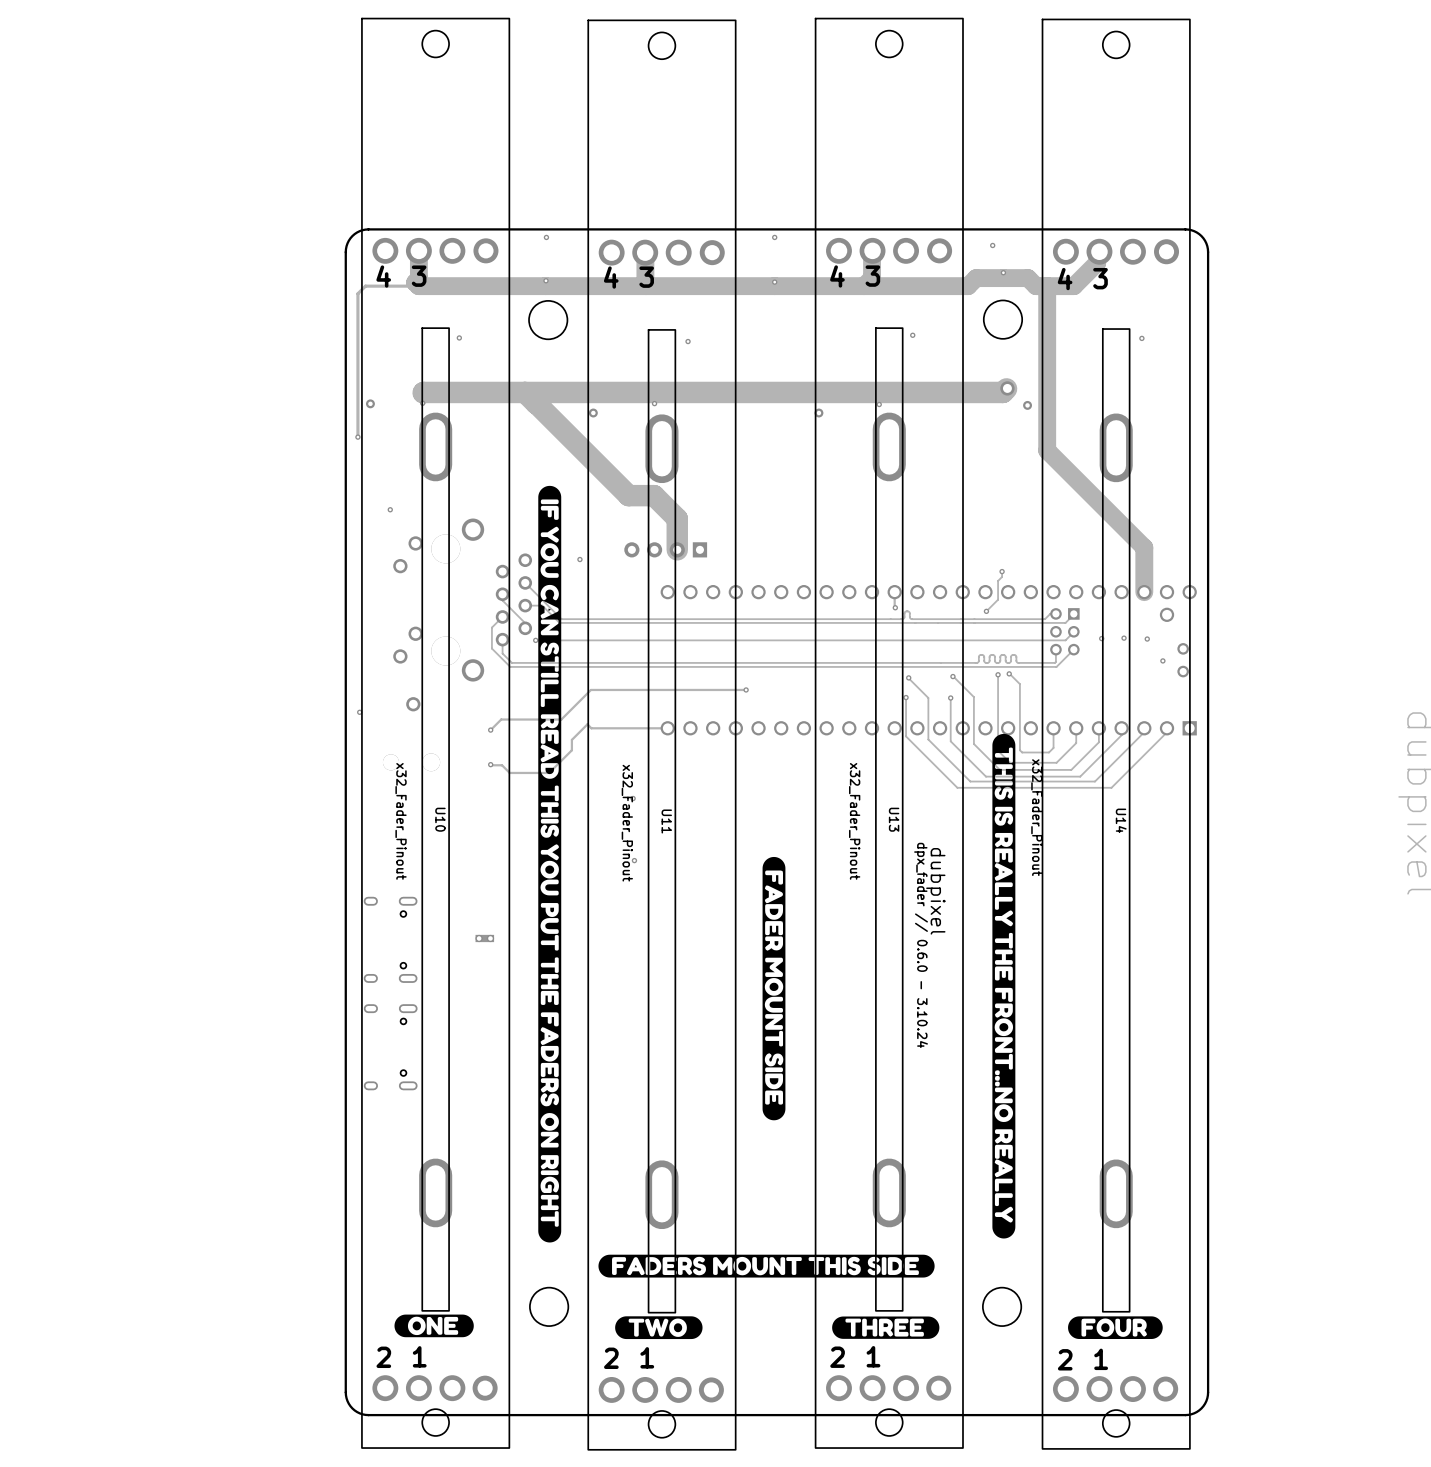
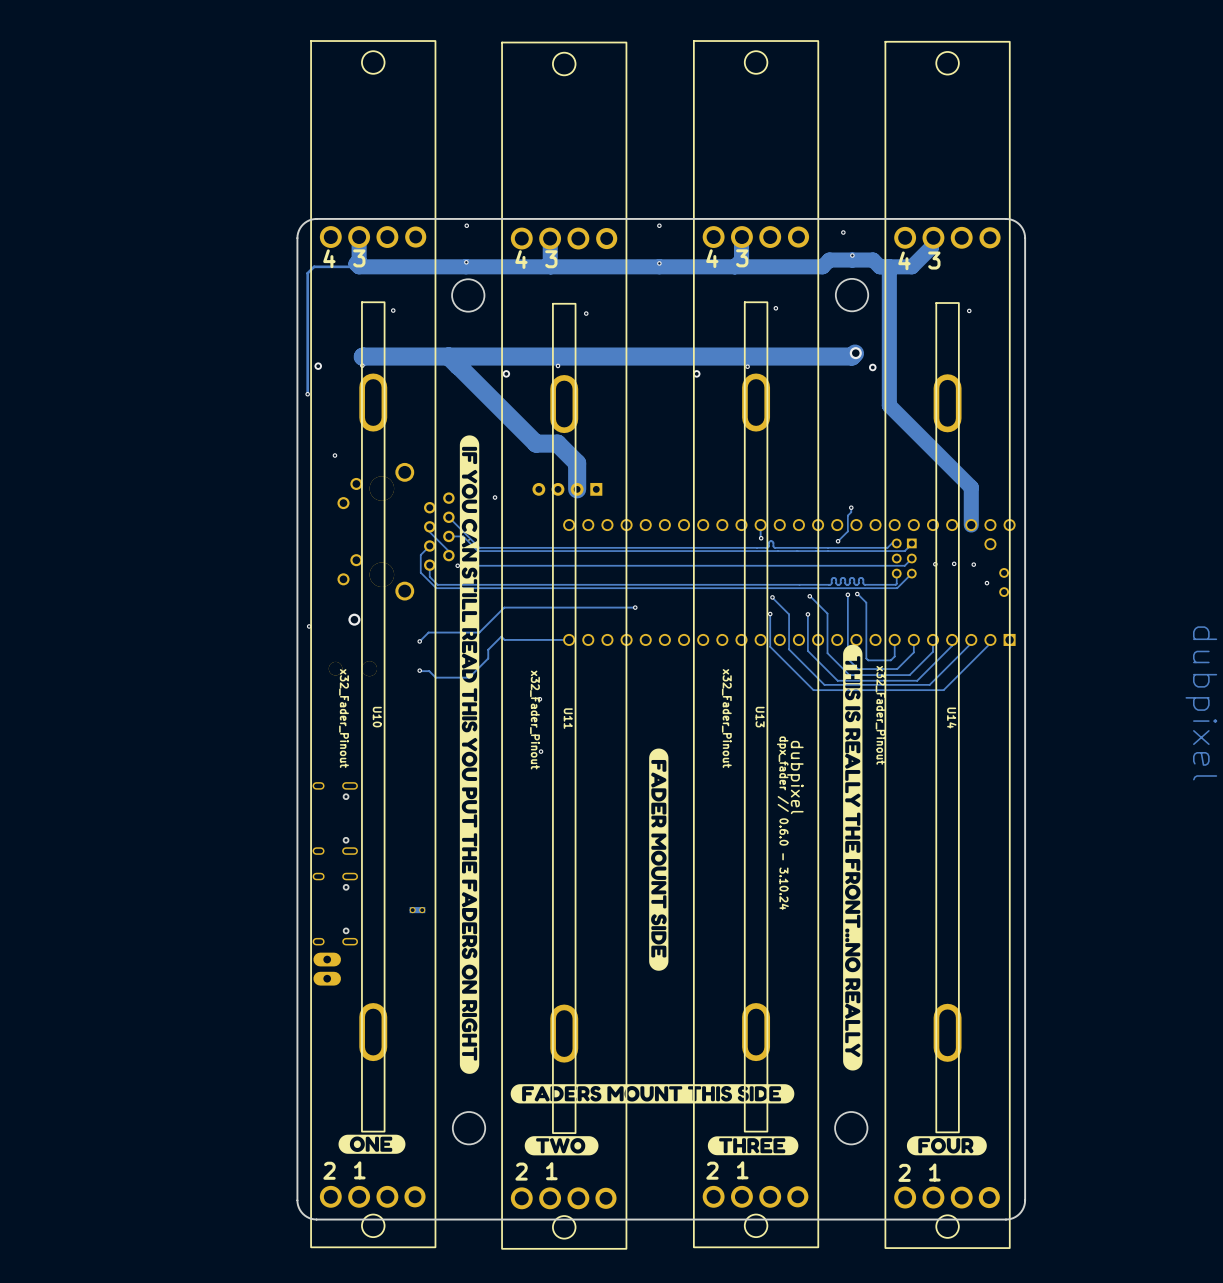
part position: (484, 938) -> (417, 910)
part: none -> (327, 969)

